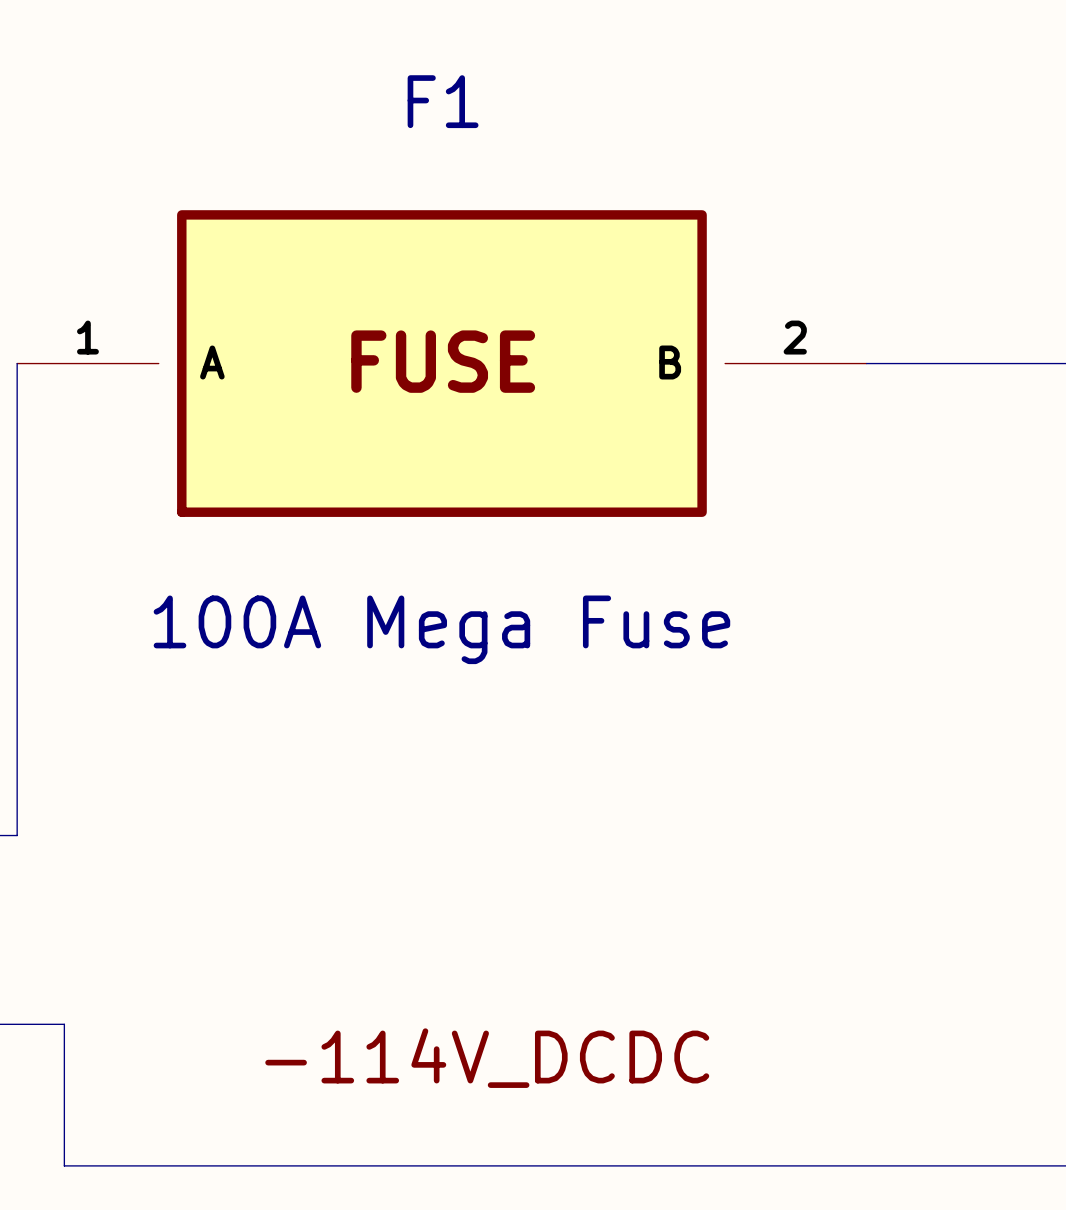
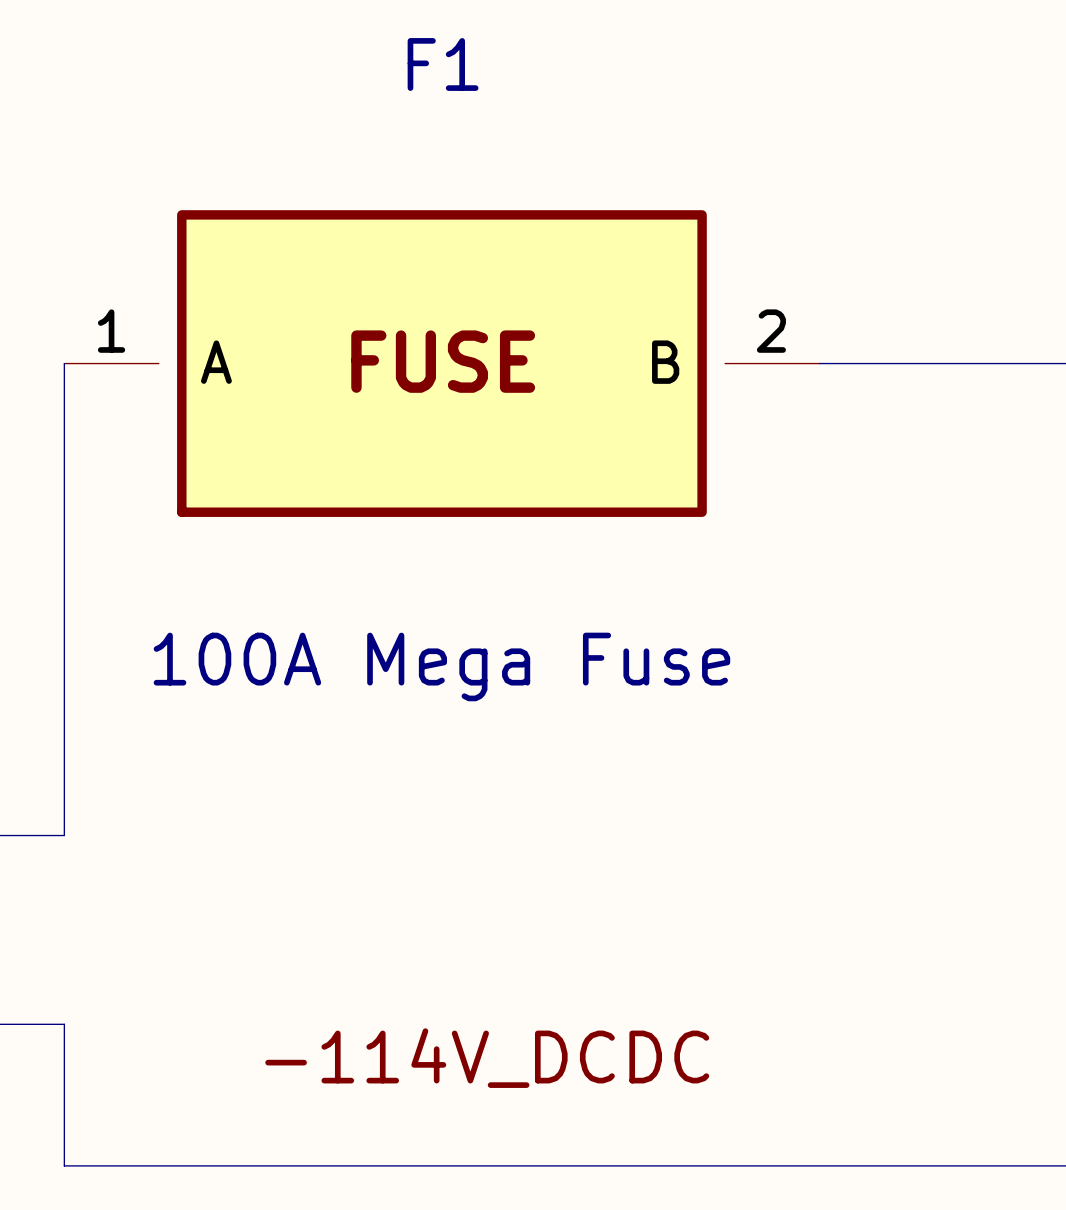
F1 symbol: [17, 210, 867, 517] -> [64, 210, 820, 517]
wire: (17, 363) (17, 835) -> (64, 363) (64, 835) (17, 835)

